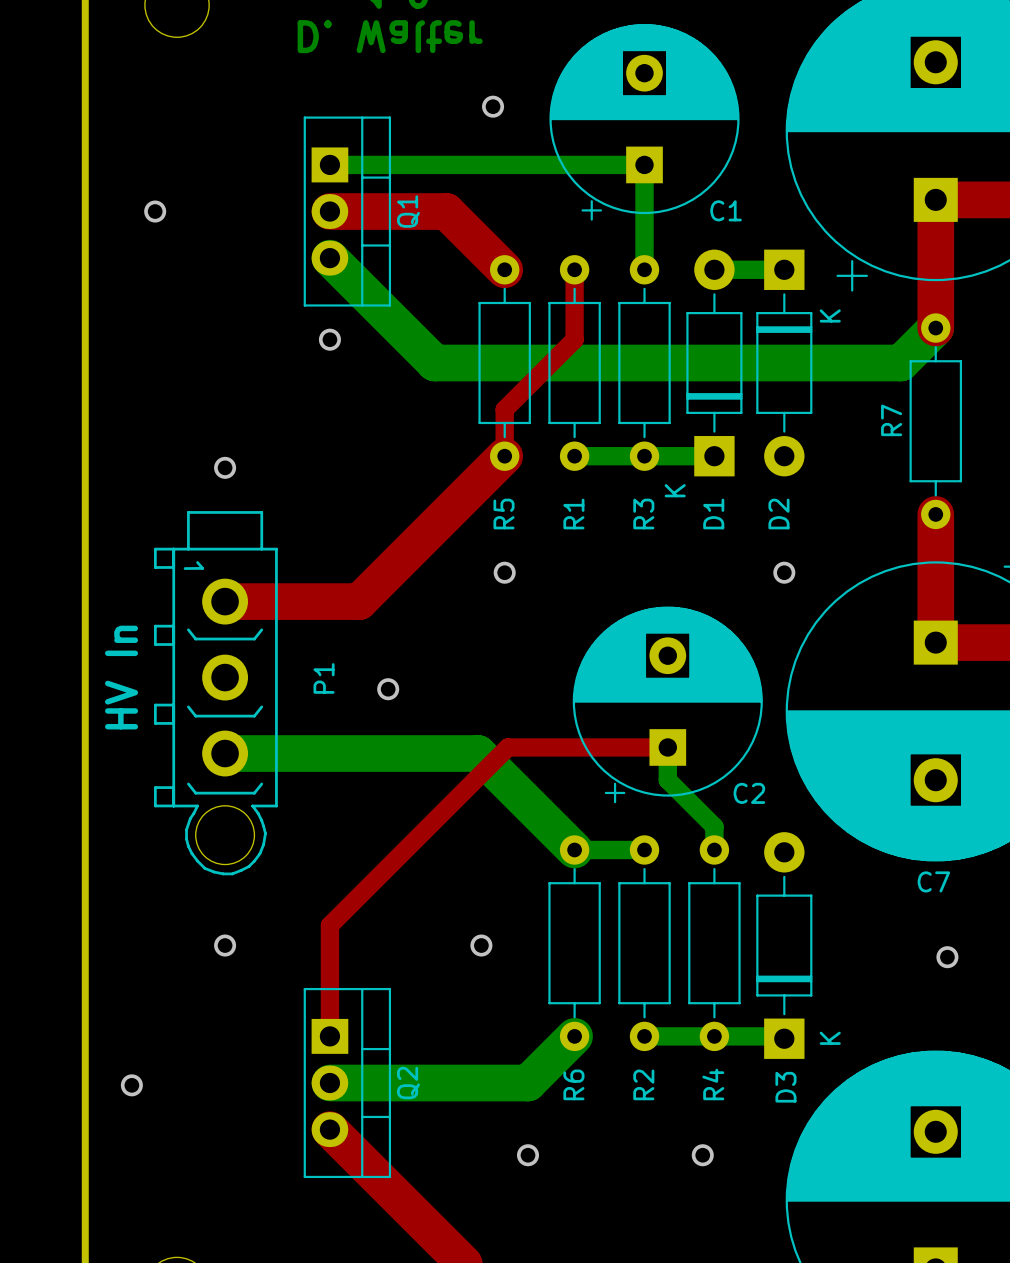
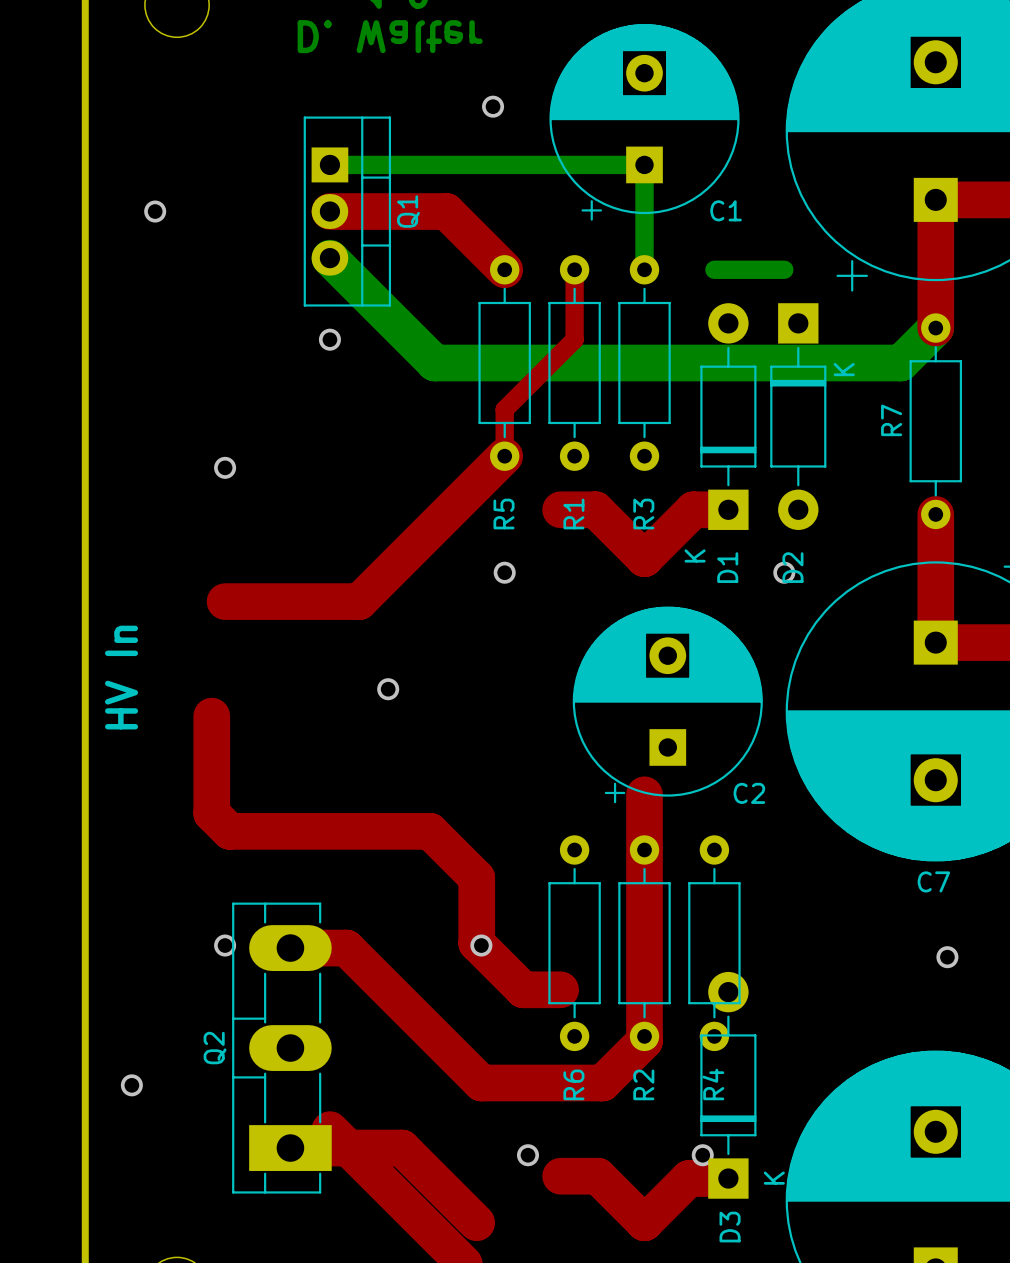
D1 position: (714, 362) -> (728, 416)
D2 position: (784, 362) -> (798, 416)
bottom track: (574, 456) (714, 456) -> none
D1 text position: K (675, 490) -> K (695, 555)
top track: none -> (560, 509) (595, 509) (644, 558) (693, 509) (728, 509)
P1: (215, 693) -> none
top track: none -> (211, 716) (211, 813) (229, 831) (430, 831) (476, 877) (476, 943) (523, 989) (560, 989)
bottom track: (667, 747) (667, 780) (714, 826) (714, 849) -> none
top track: (667, 747) (507, 747) (329, 925) (329, 1036) -> none
bottom track: (225, 753) (478, 753) (574, 849) (644, 849) -> none
top track: none -> (644, 794) (644, 1041) (602, 1083) (481, 1083) (346, 948) (290, 948)
D3 position: (784, 945) -> (728, 1085)
Q2 footprint: [303, 987, 392, 1179] -> [232, 902, 332, 1194]
bottom track: (574, 1036) (528, 1083) (329, 1083) -> none
bottom track: (644, 1036) (781, 1036) (784, 1038) -> none
Q2 name position: Q2 (408, 1083) -> Q2 (215, 1048)
top track: none -> (290, 1148) (401, 1148) (476, 1222)
top track: none -> (560, 1176) (597, 1176) (644, 1222) (688, 1178) (728, 1178)

